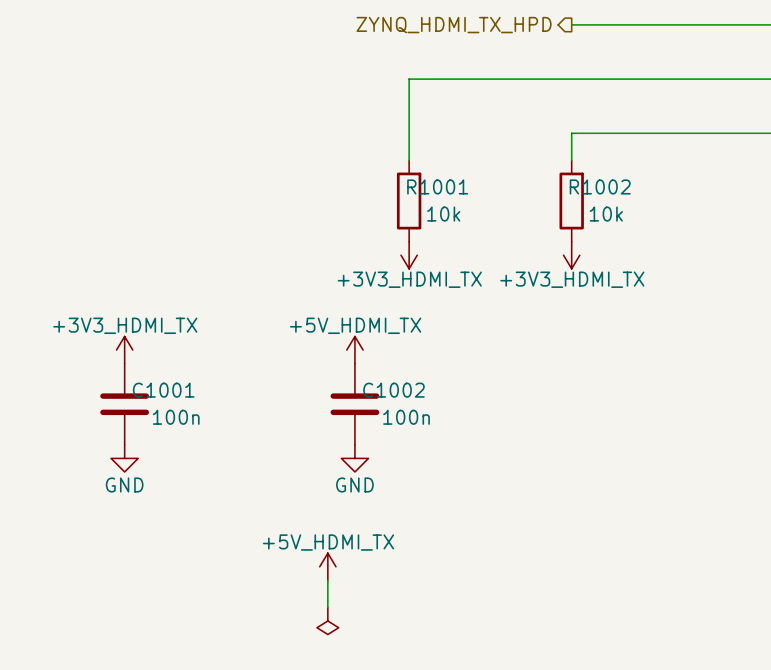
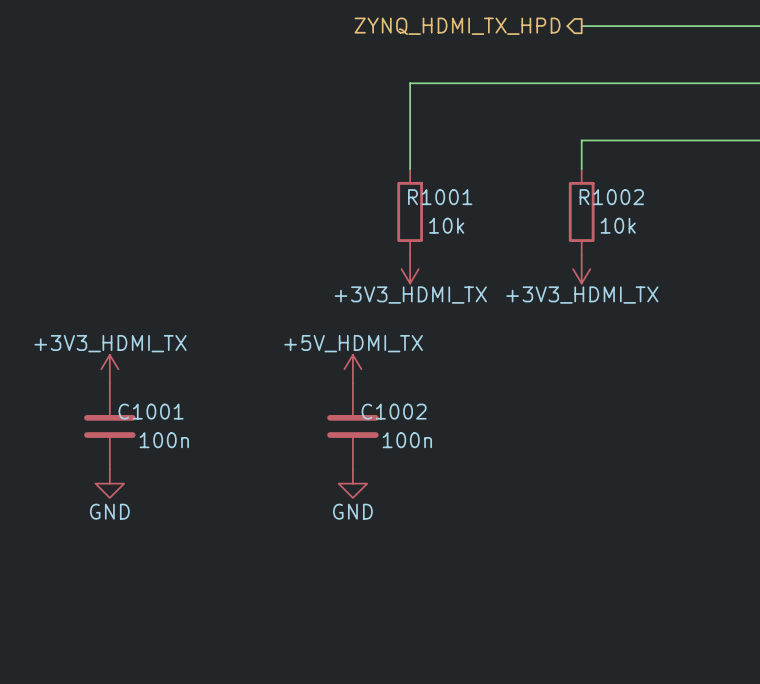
power symbol: +5V_HDMI_TX (327, 566) -> none
wire: (327, 580) (327, 607) -> none
power symbol: (327, 620) -> none

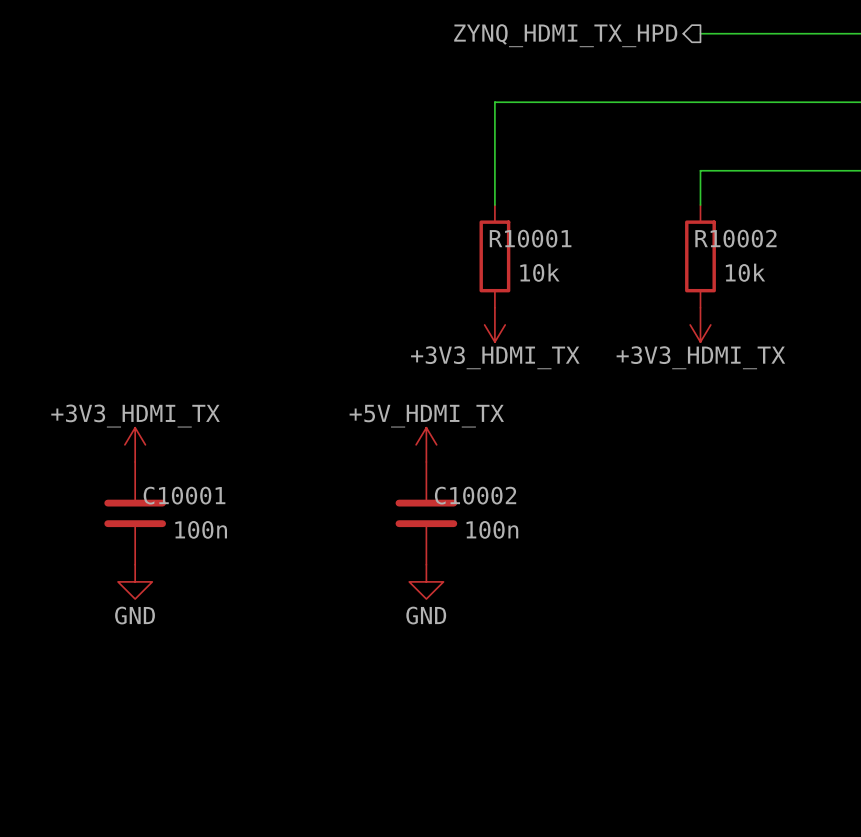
R1001 name: R1001 (440, 197) -> R10001 (530, 238)
R1002 name: R1002 (611, 197) -> R10002 (735, 238)
C1001 name: C1001 (151, 411) -> C10001 (184, 495)
C1002 name: C1002 (394, 411) -> C10002 (475, 495)

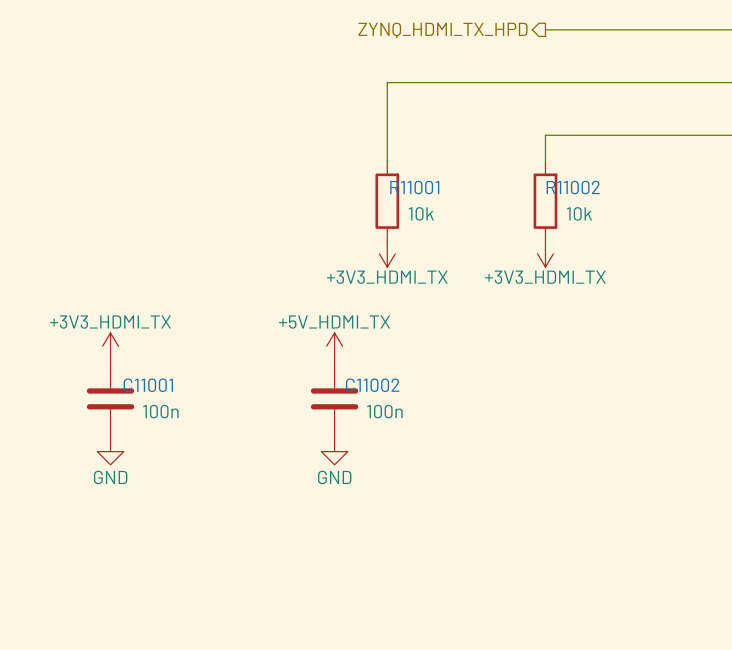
R10001 name: R10001 (530, 238) -> R11001 (414, 187)
R10002 name: R10002 (735, 238) -> R11002 (573, 187)
C10001 name: C10001 (184, 495) -> C11001 (148, 385)
C10002 name: C10002 (475, 495) -> C11002 (372, 385)

